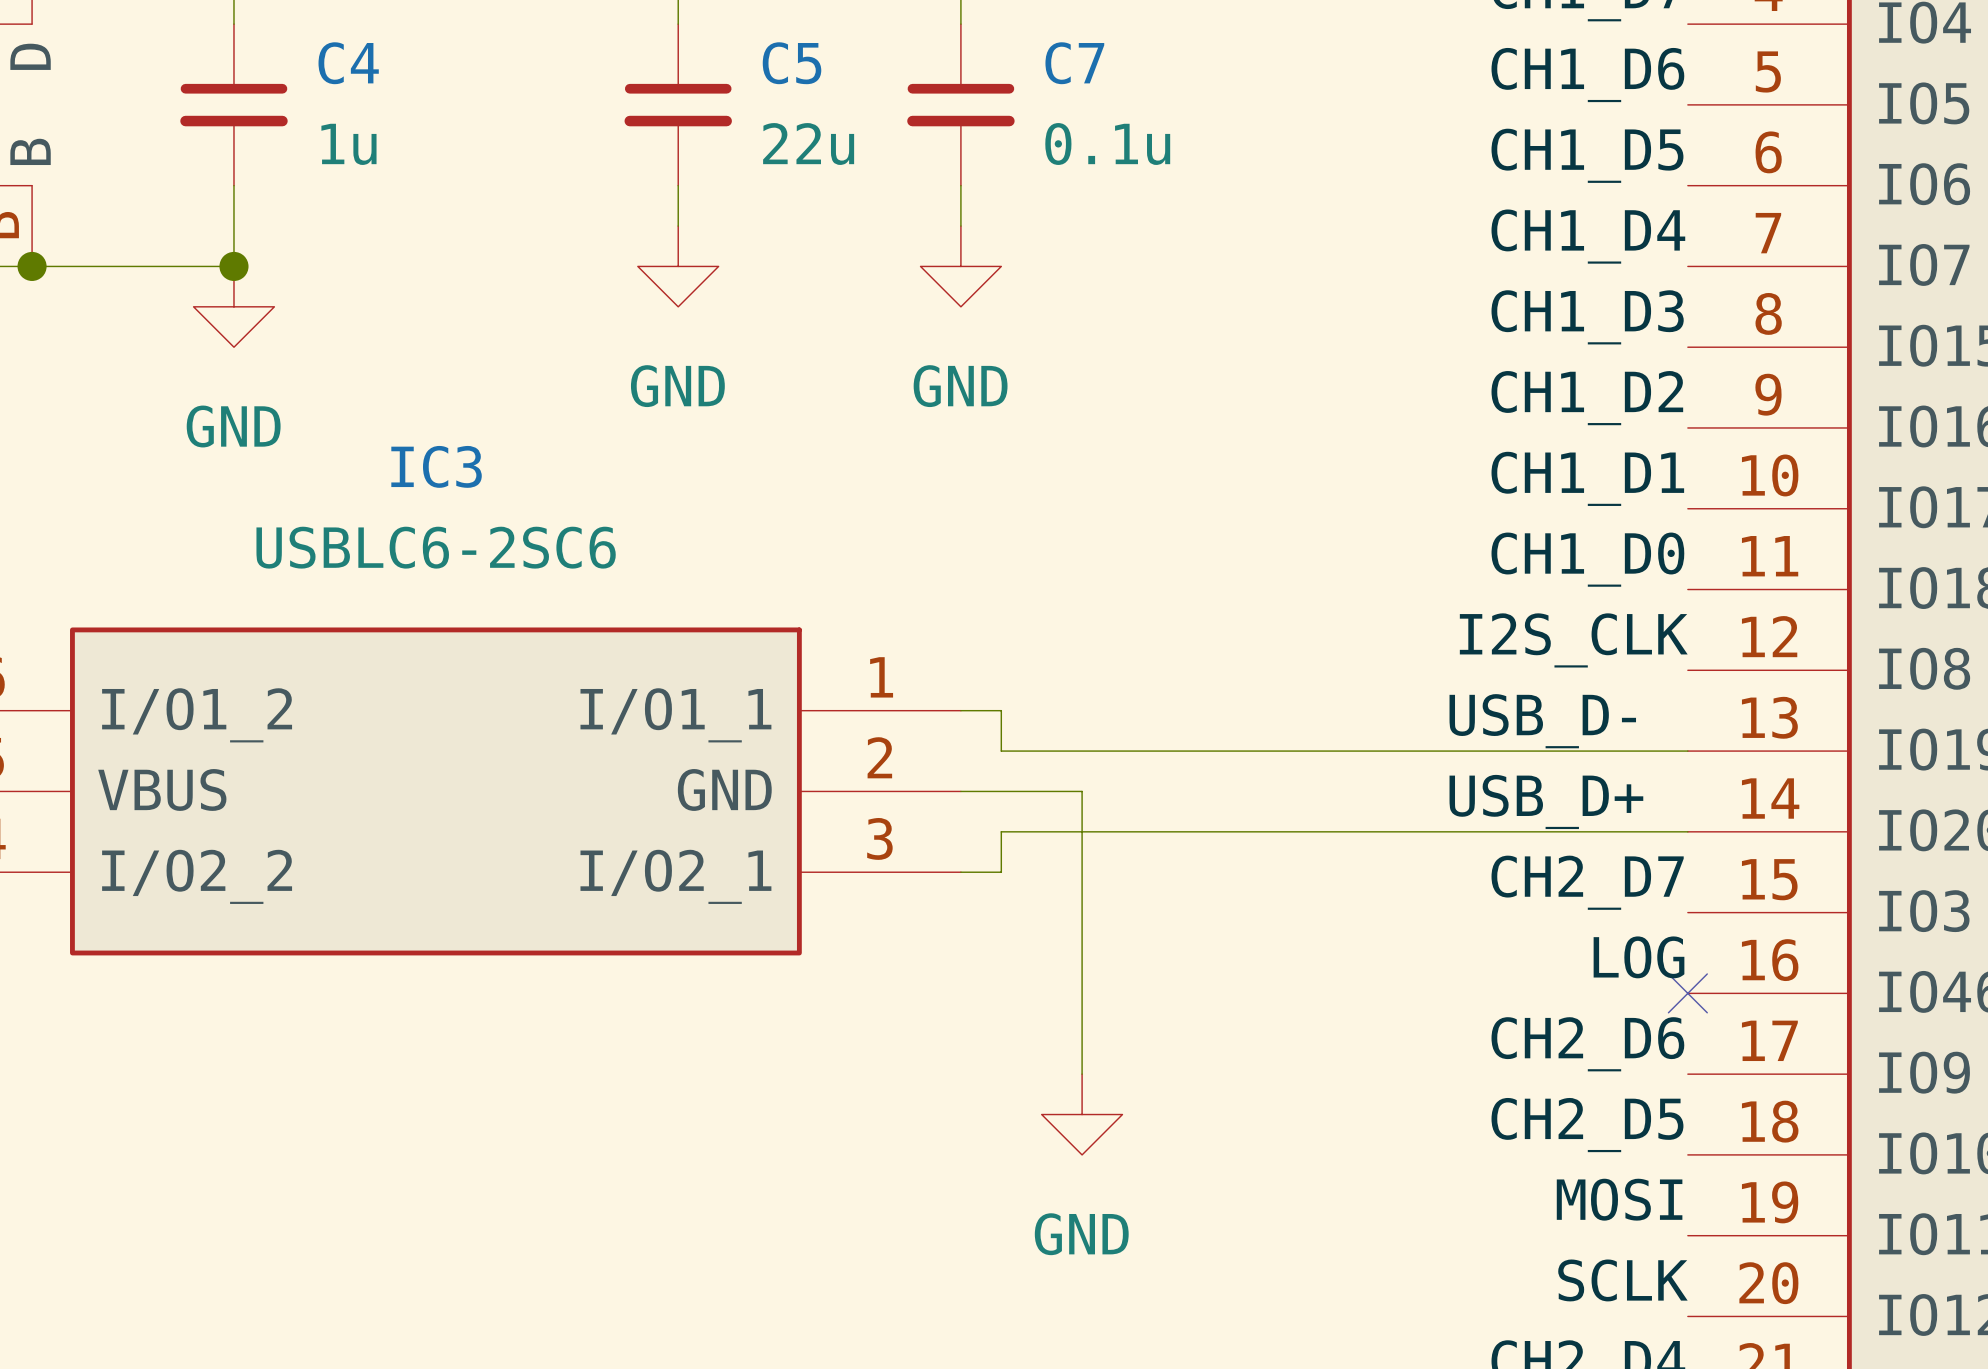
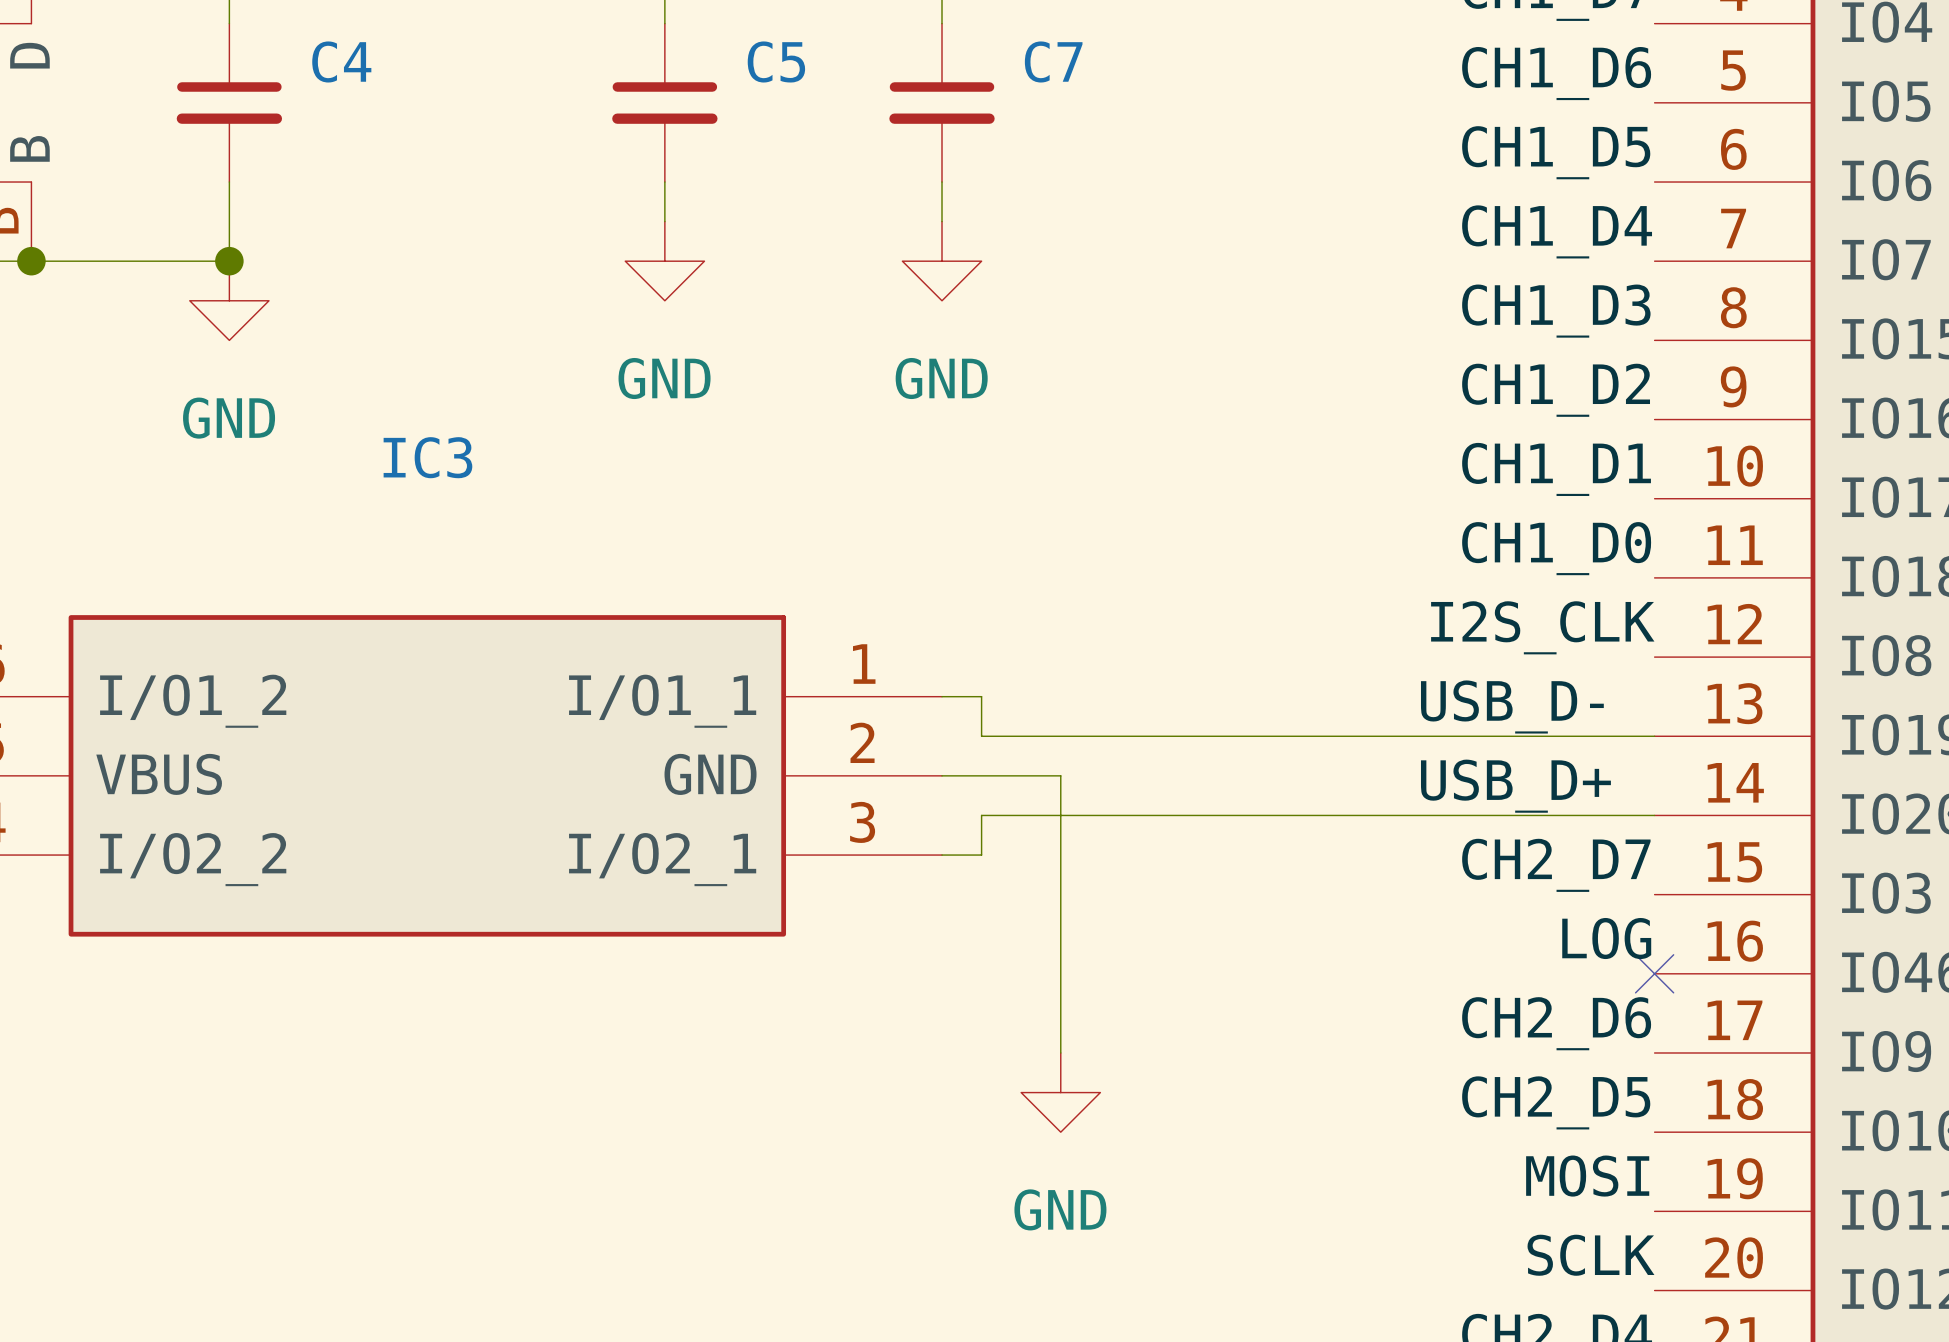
C4 value: 1u (348, 144) -> none
C5 value: 22u (808, 144) -> none
C7 value: 0.1u (1107, 144) -> none
IC3 value: USBLC6-2SC6 (436, 547) -> none

